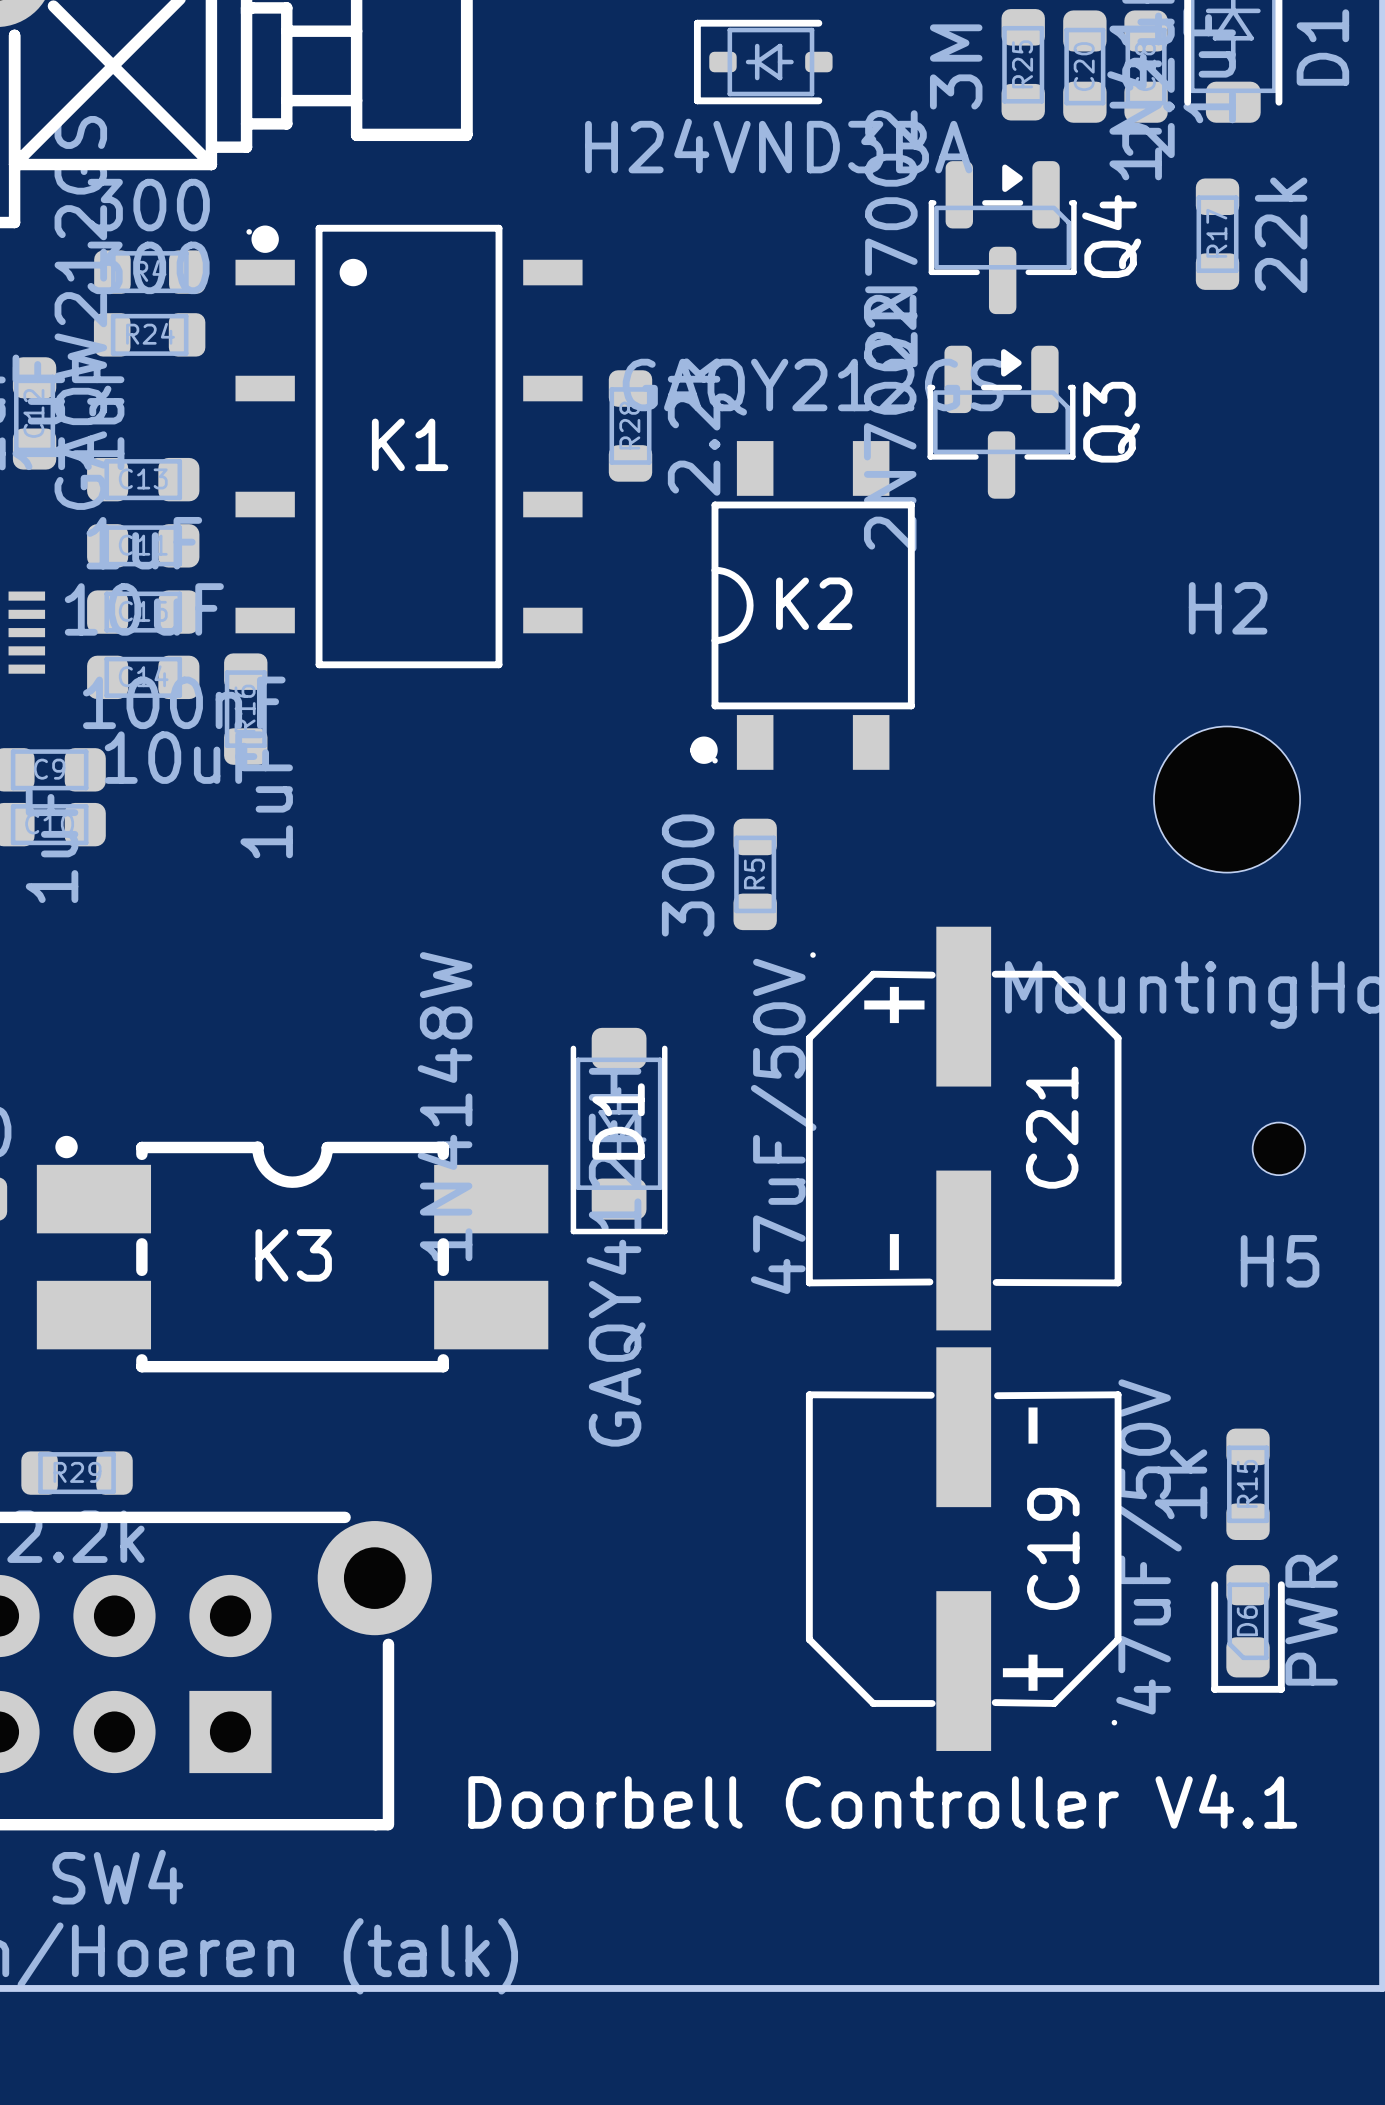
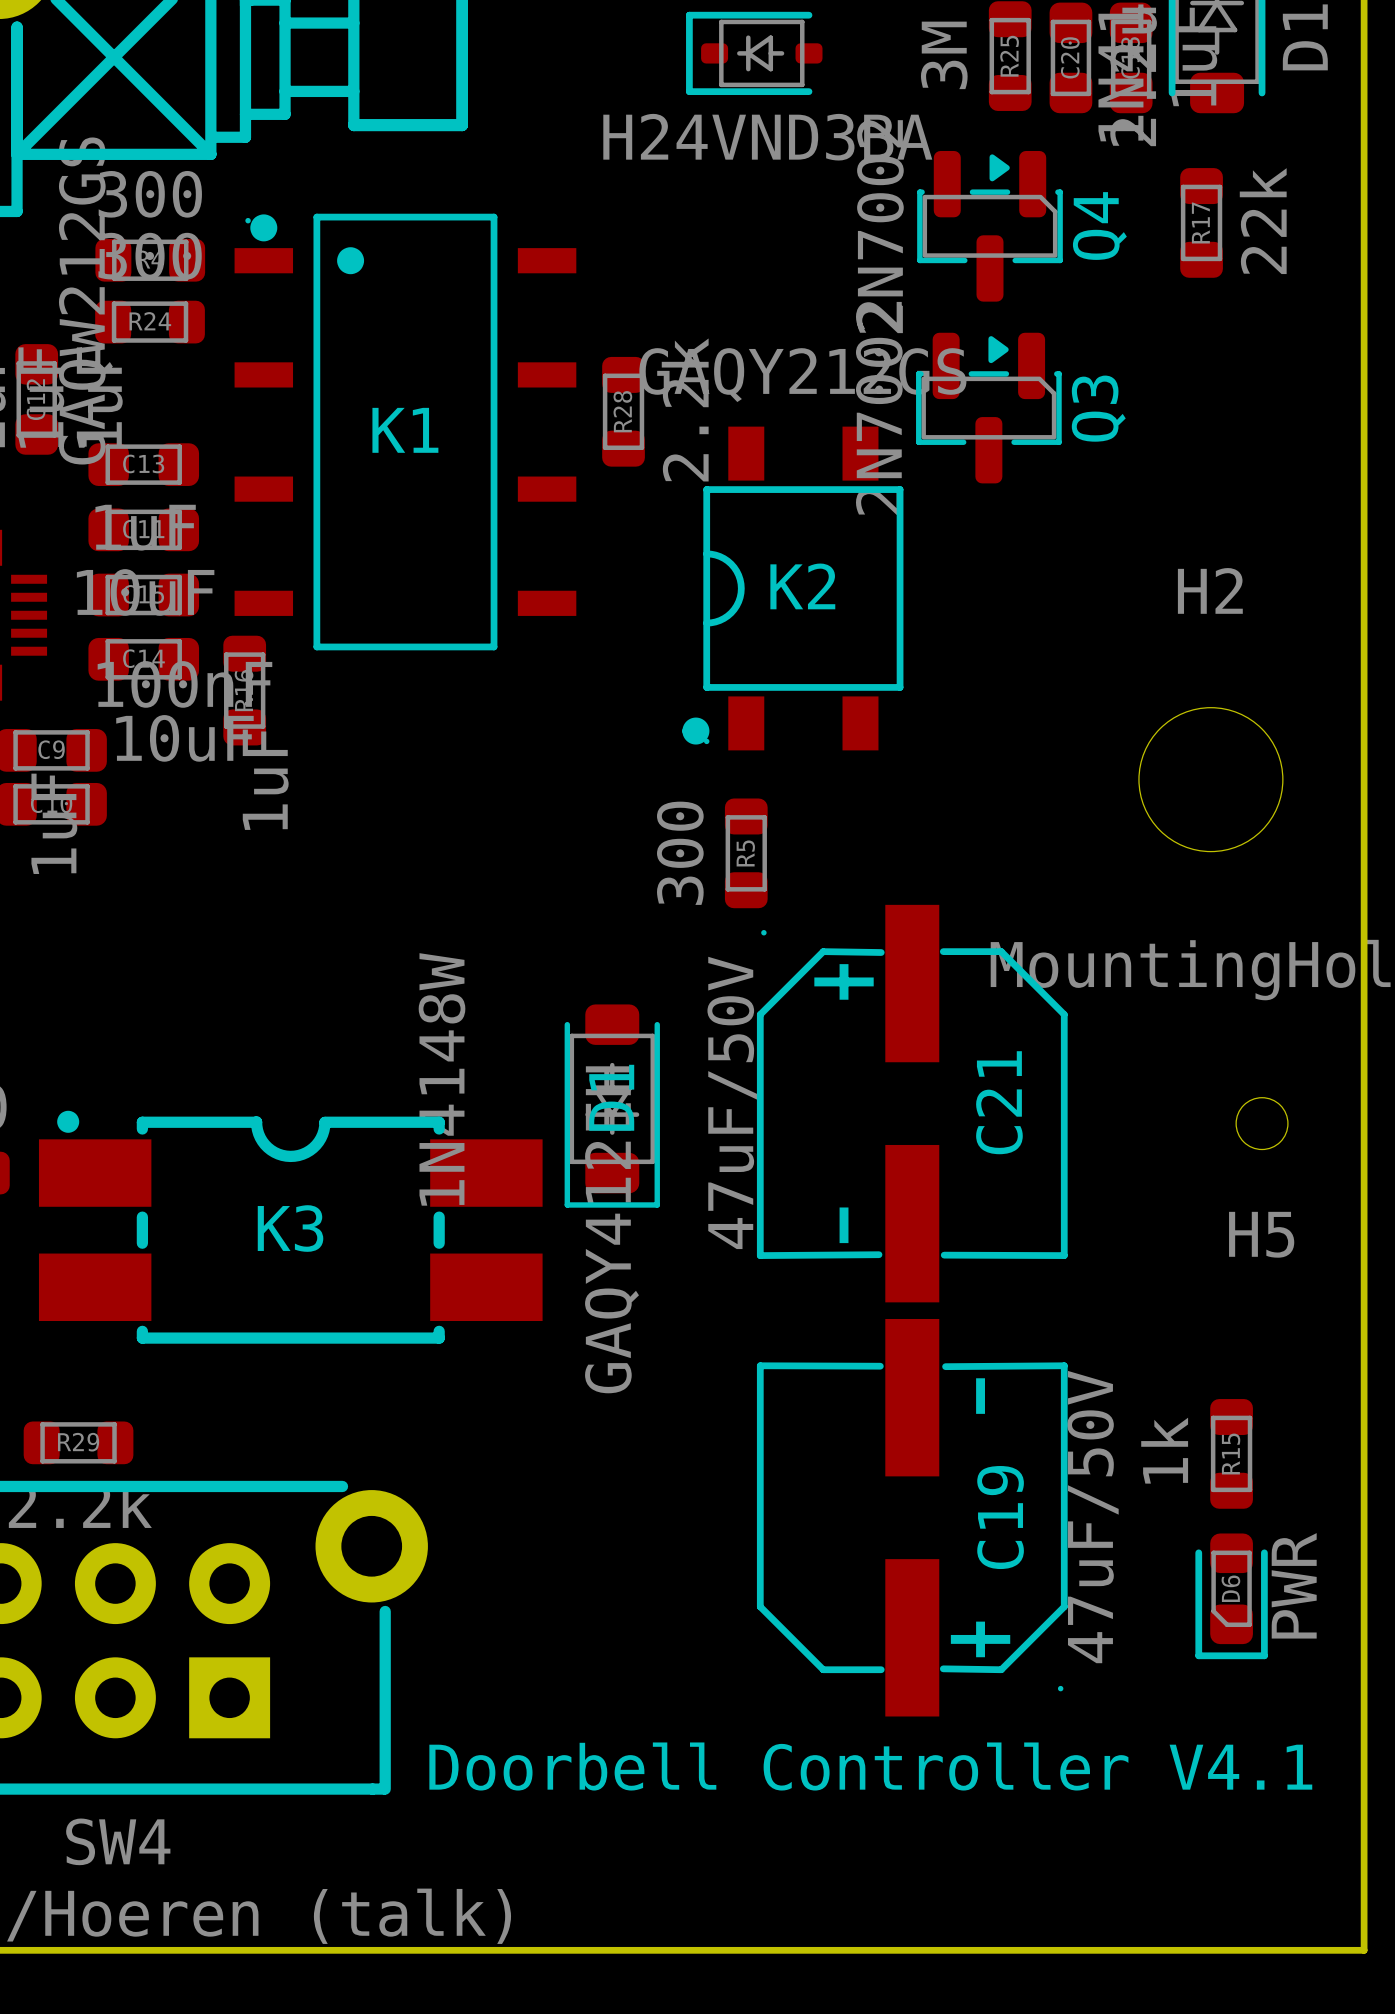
C21 position: (963, 1128) -> (912, 1103)
C19 position: (963, 1549) -> (912, 1517)

